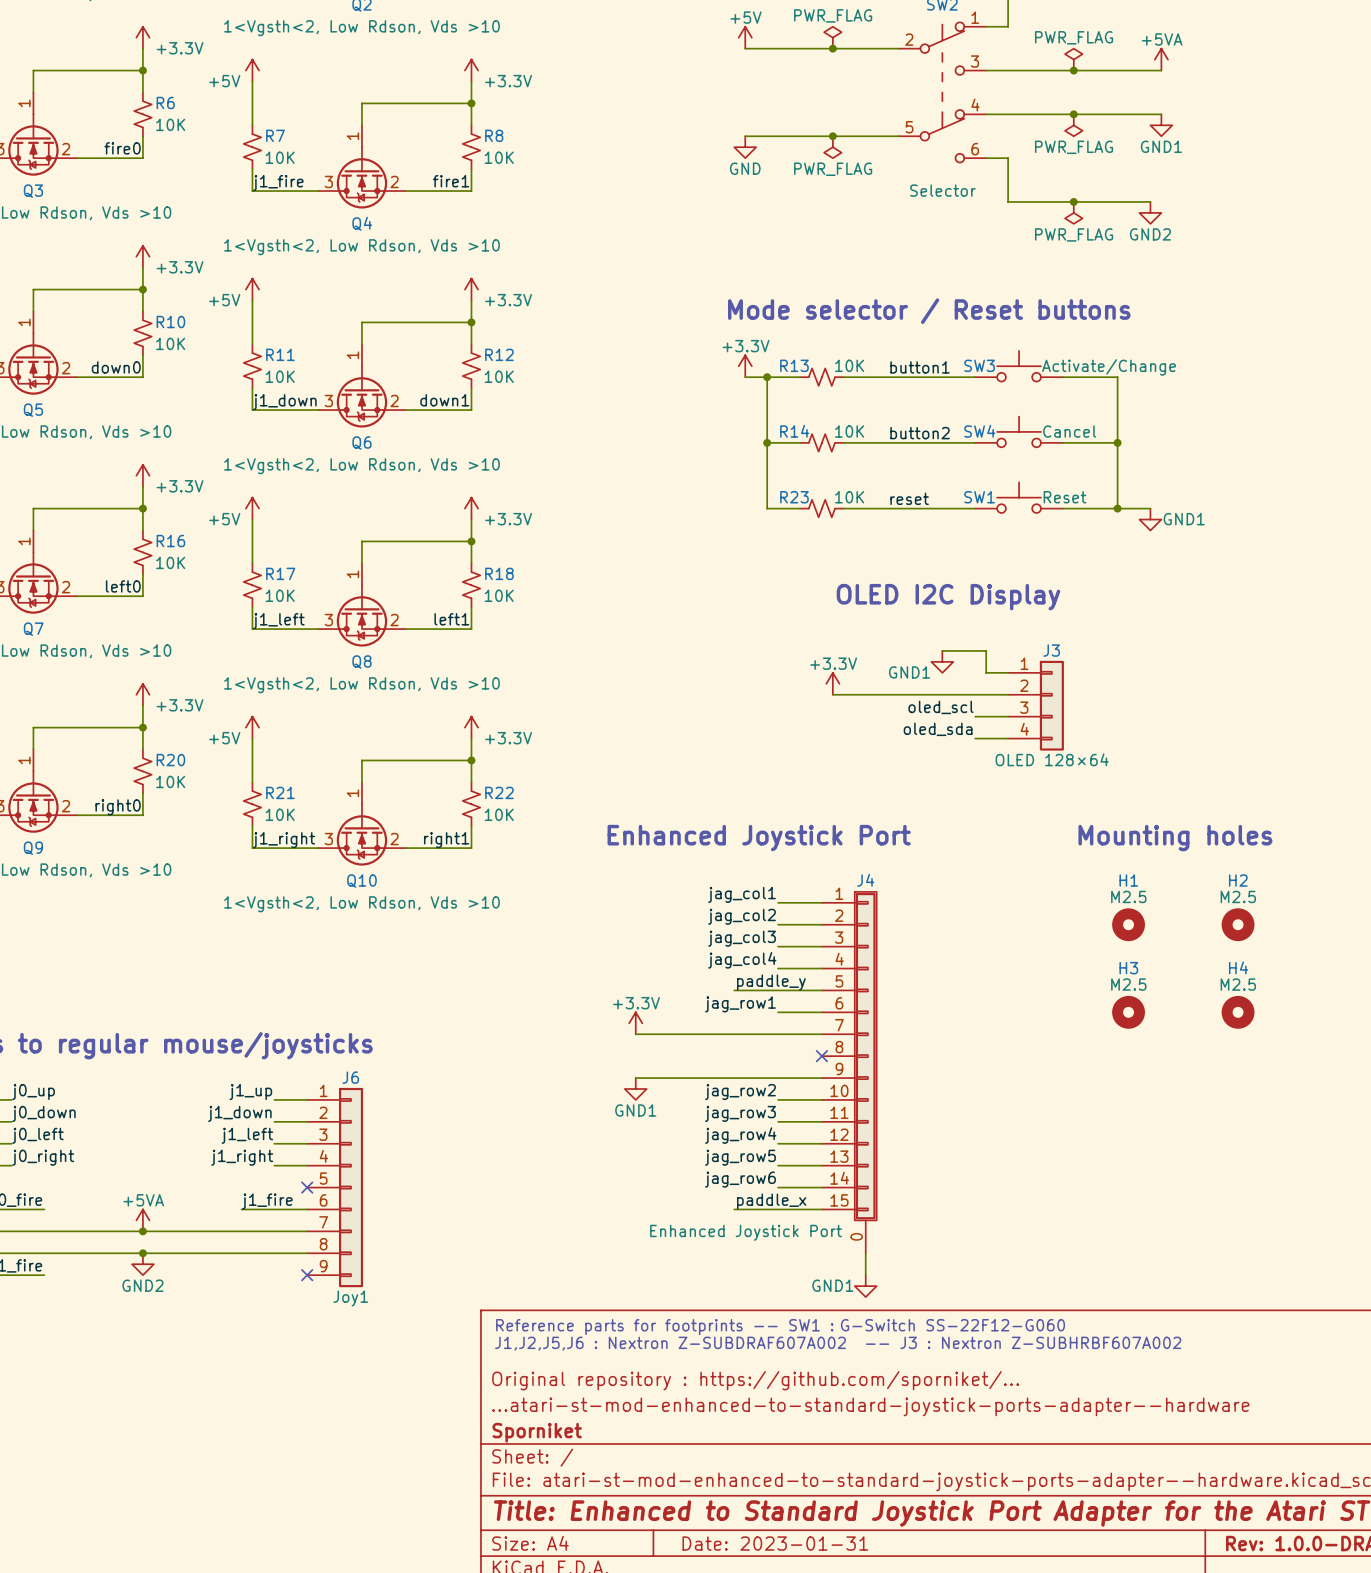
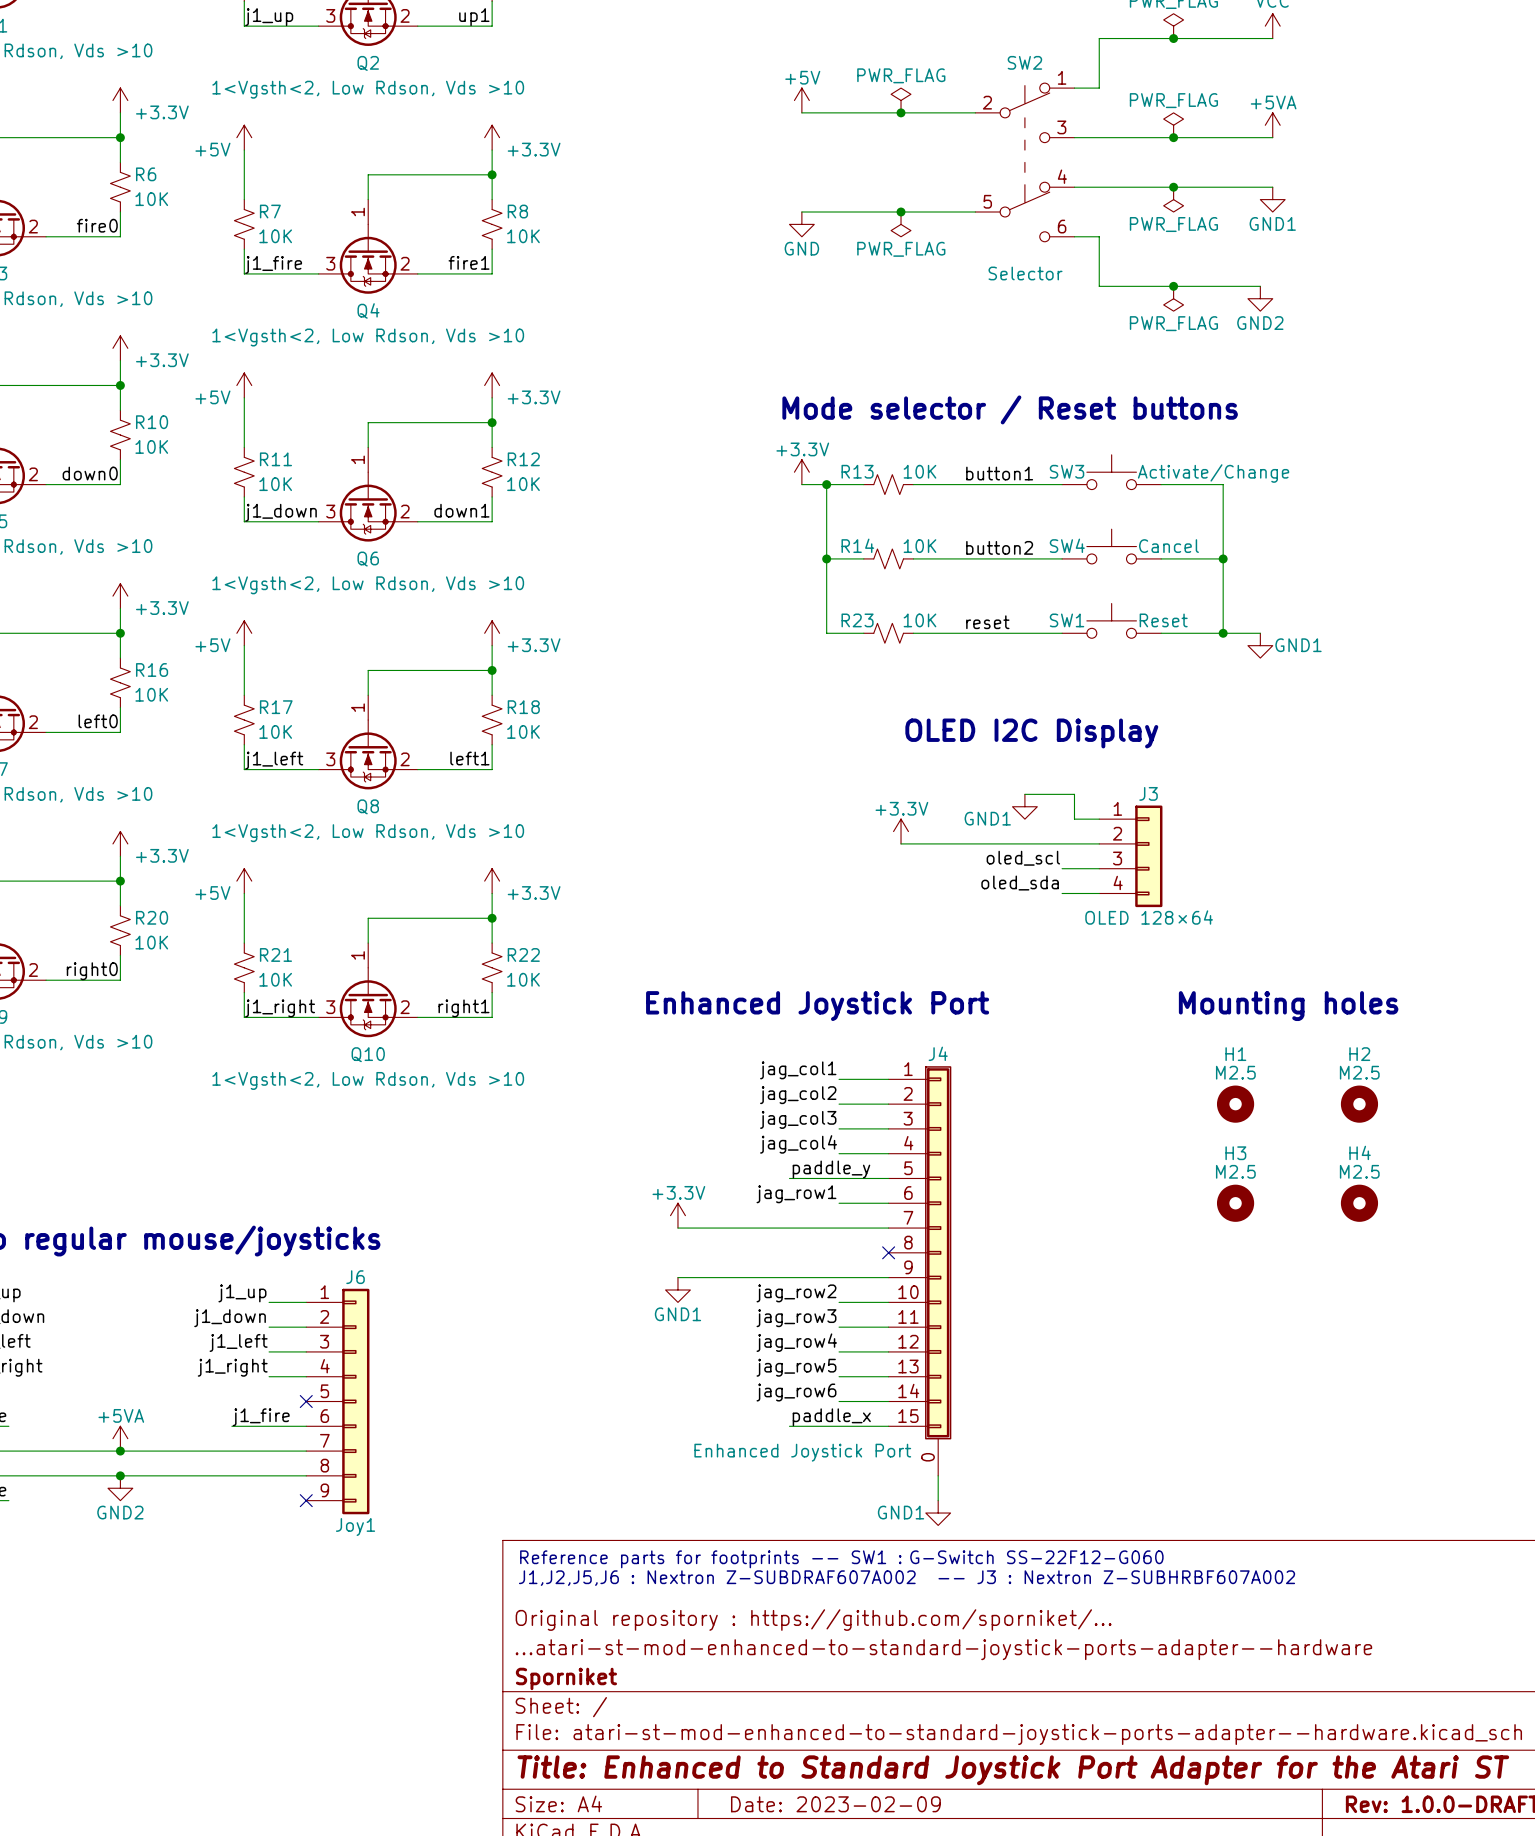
title block: Date: 2023-01-31 (775, 1543) -> Date: 2023-02-09 (835, 1804)

